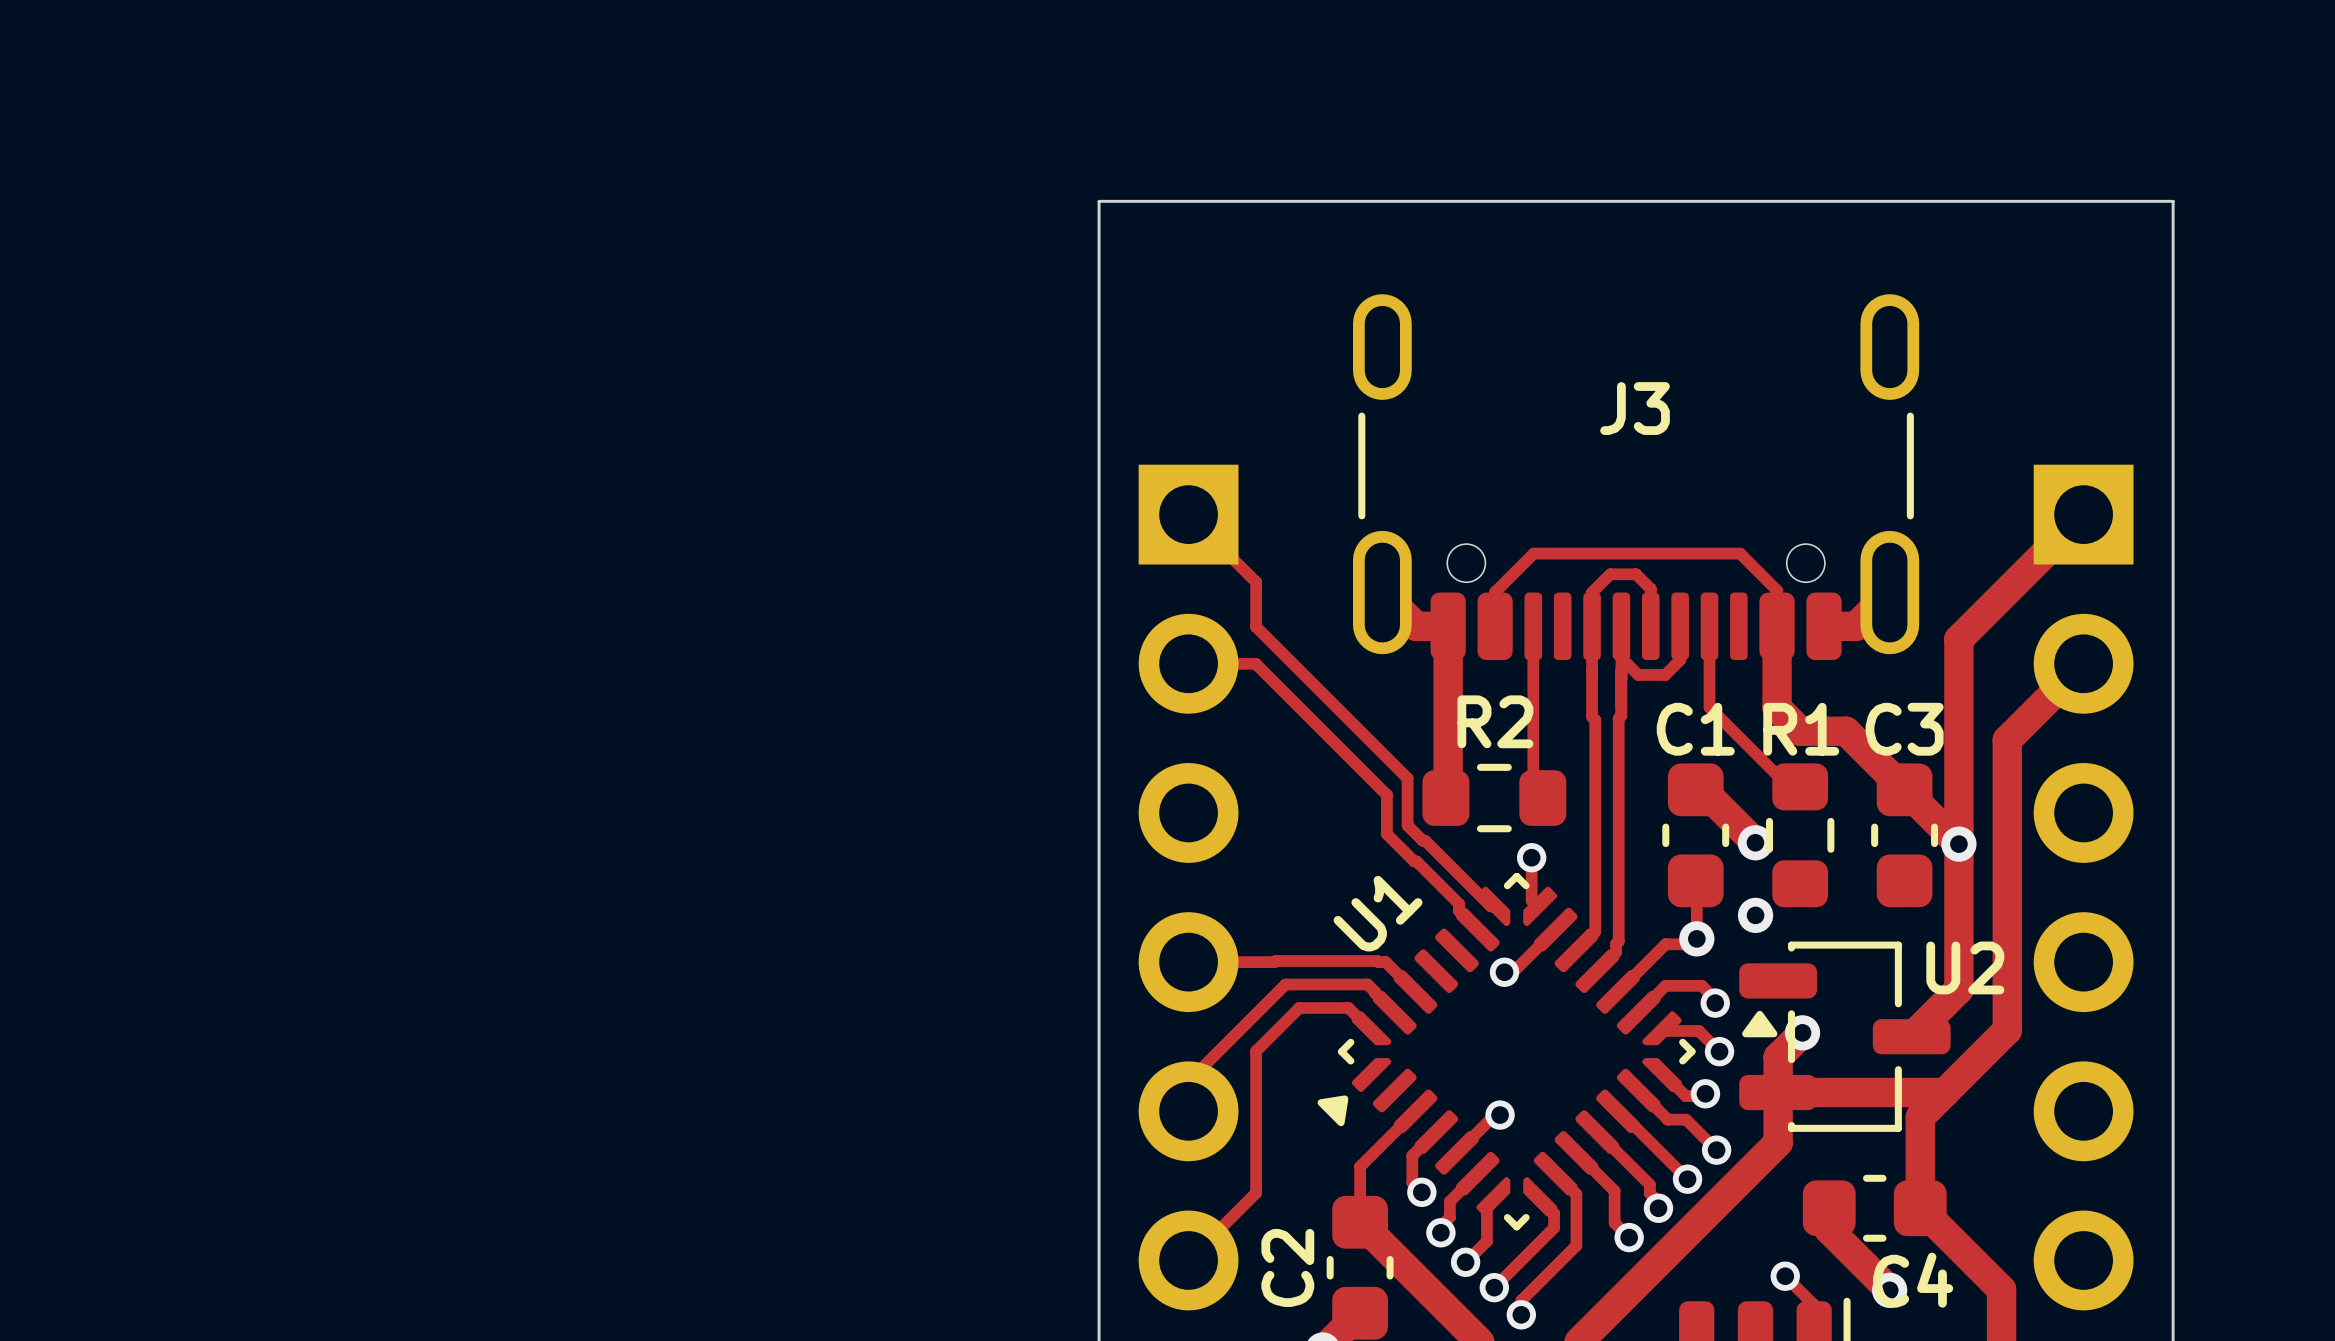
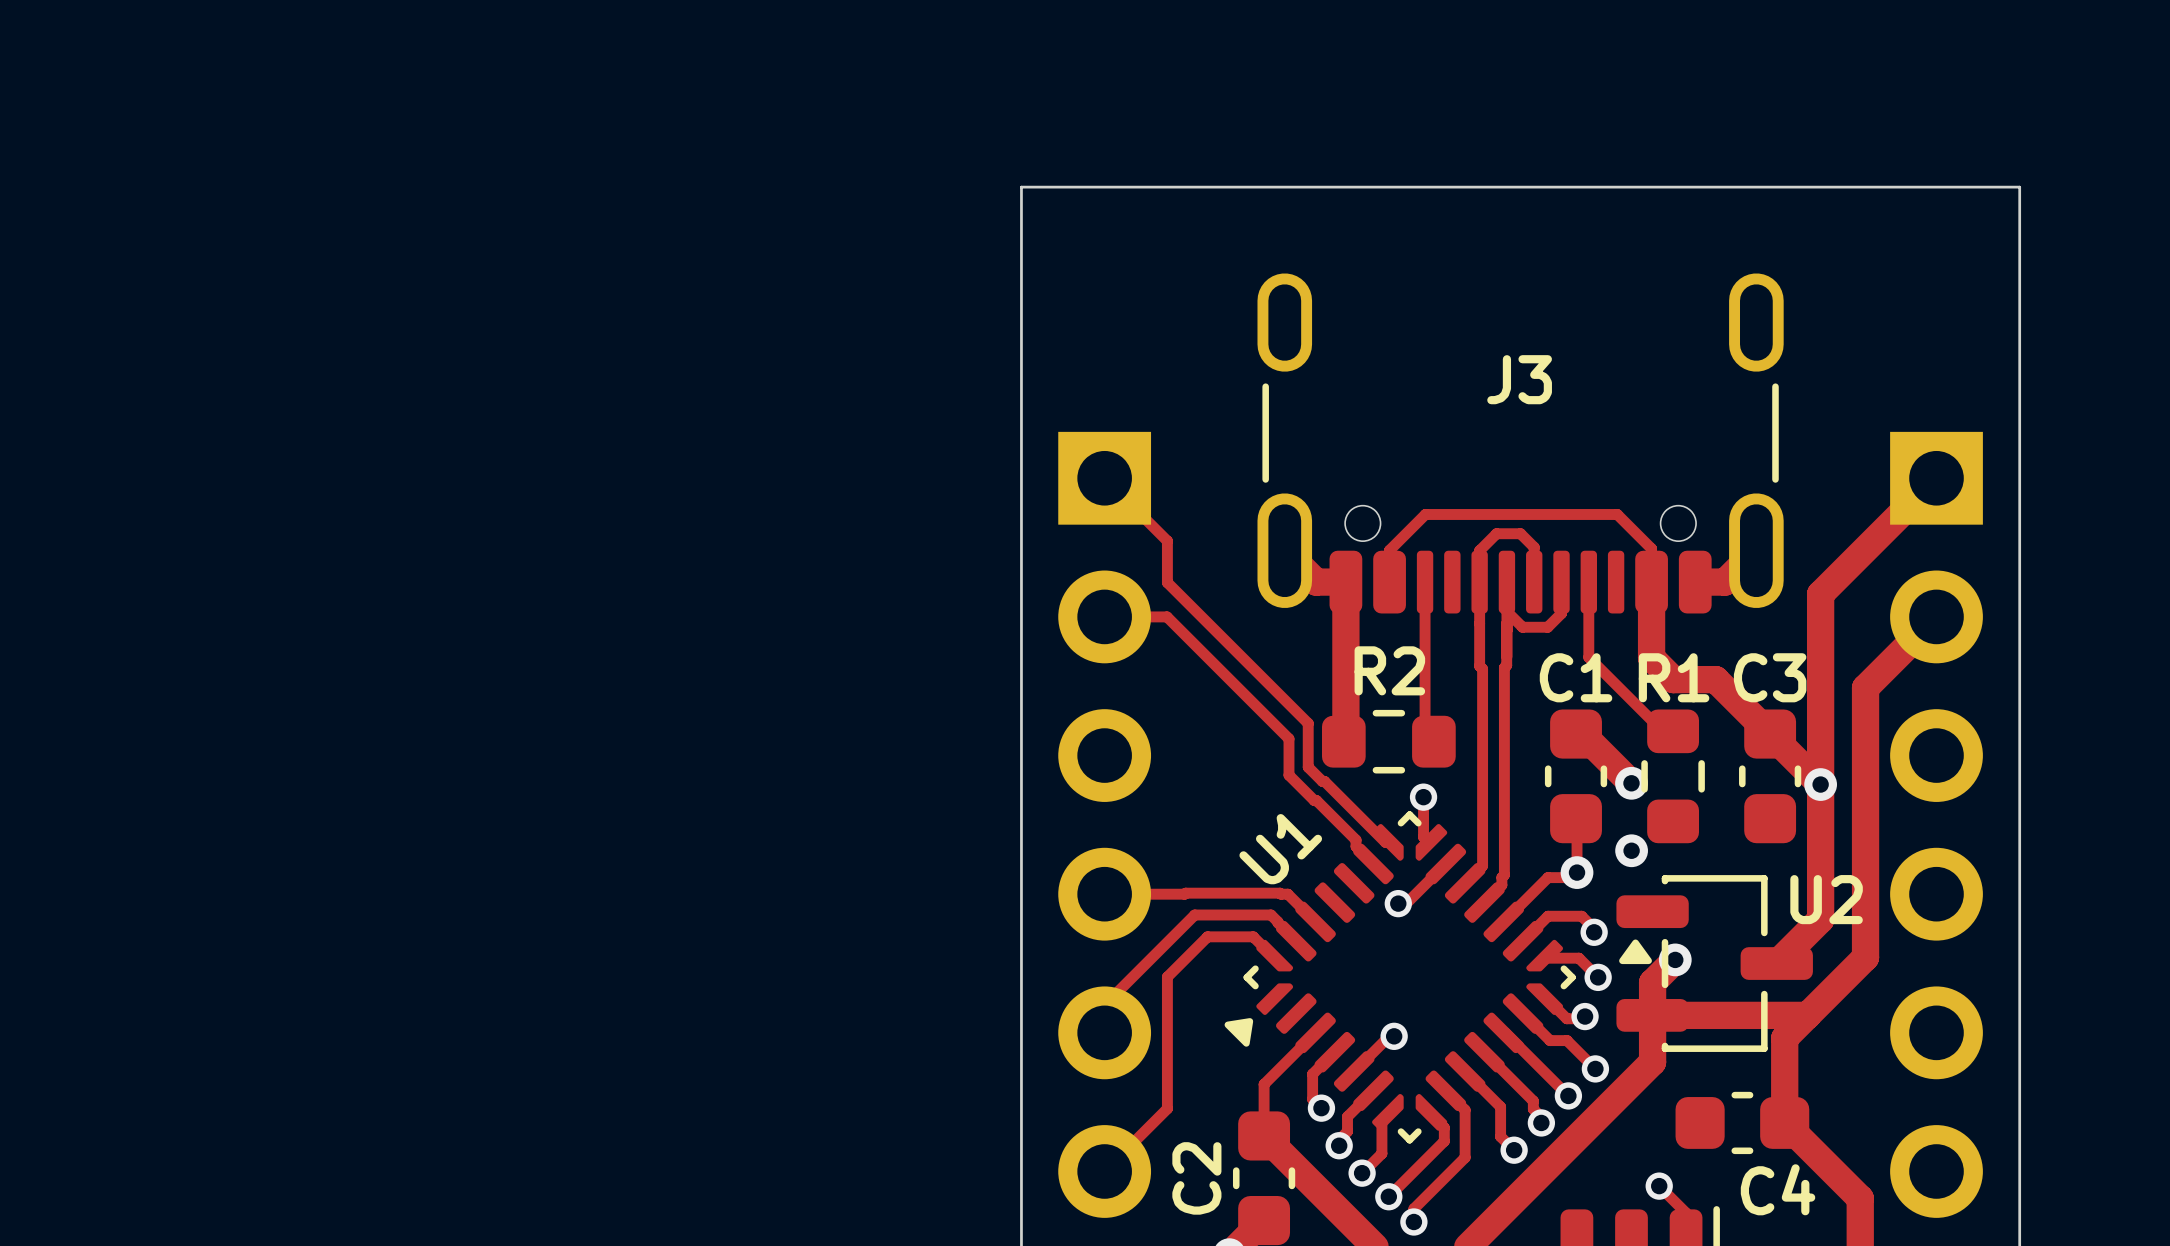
track: (1829, 1208) (1829, 1229) (1889, 1290) -> none
via: (1889, 1290) -> none

